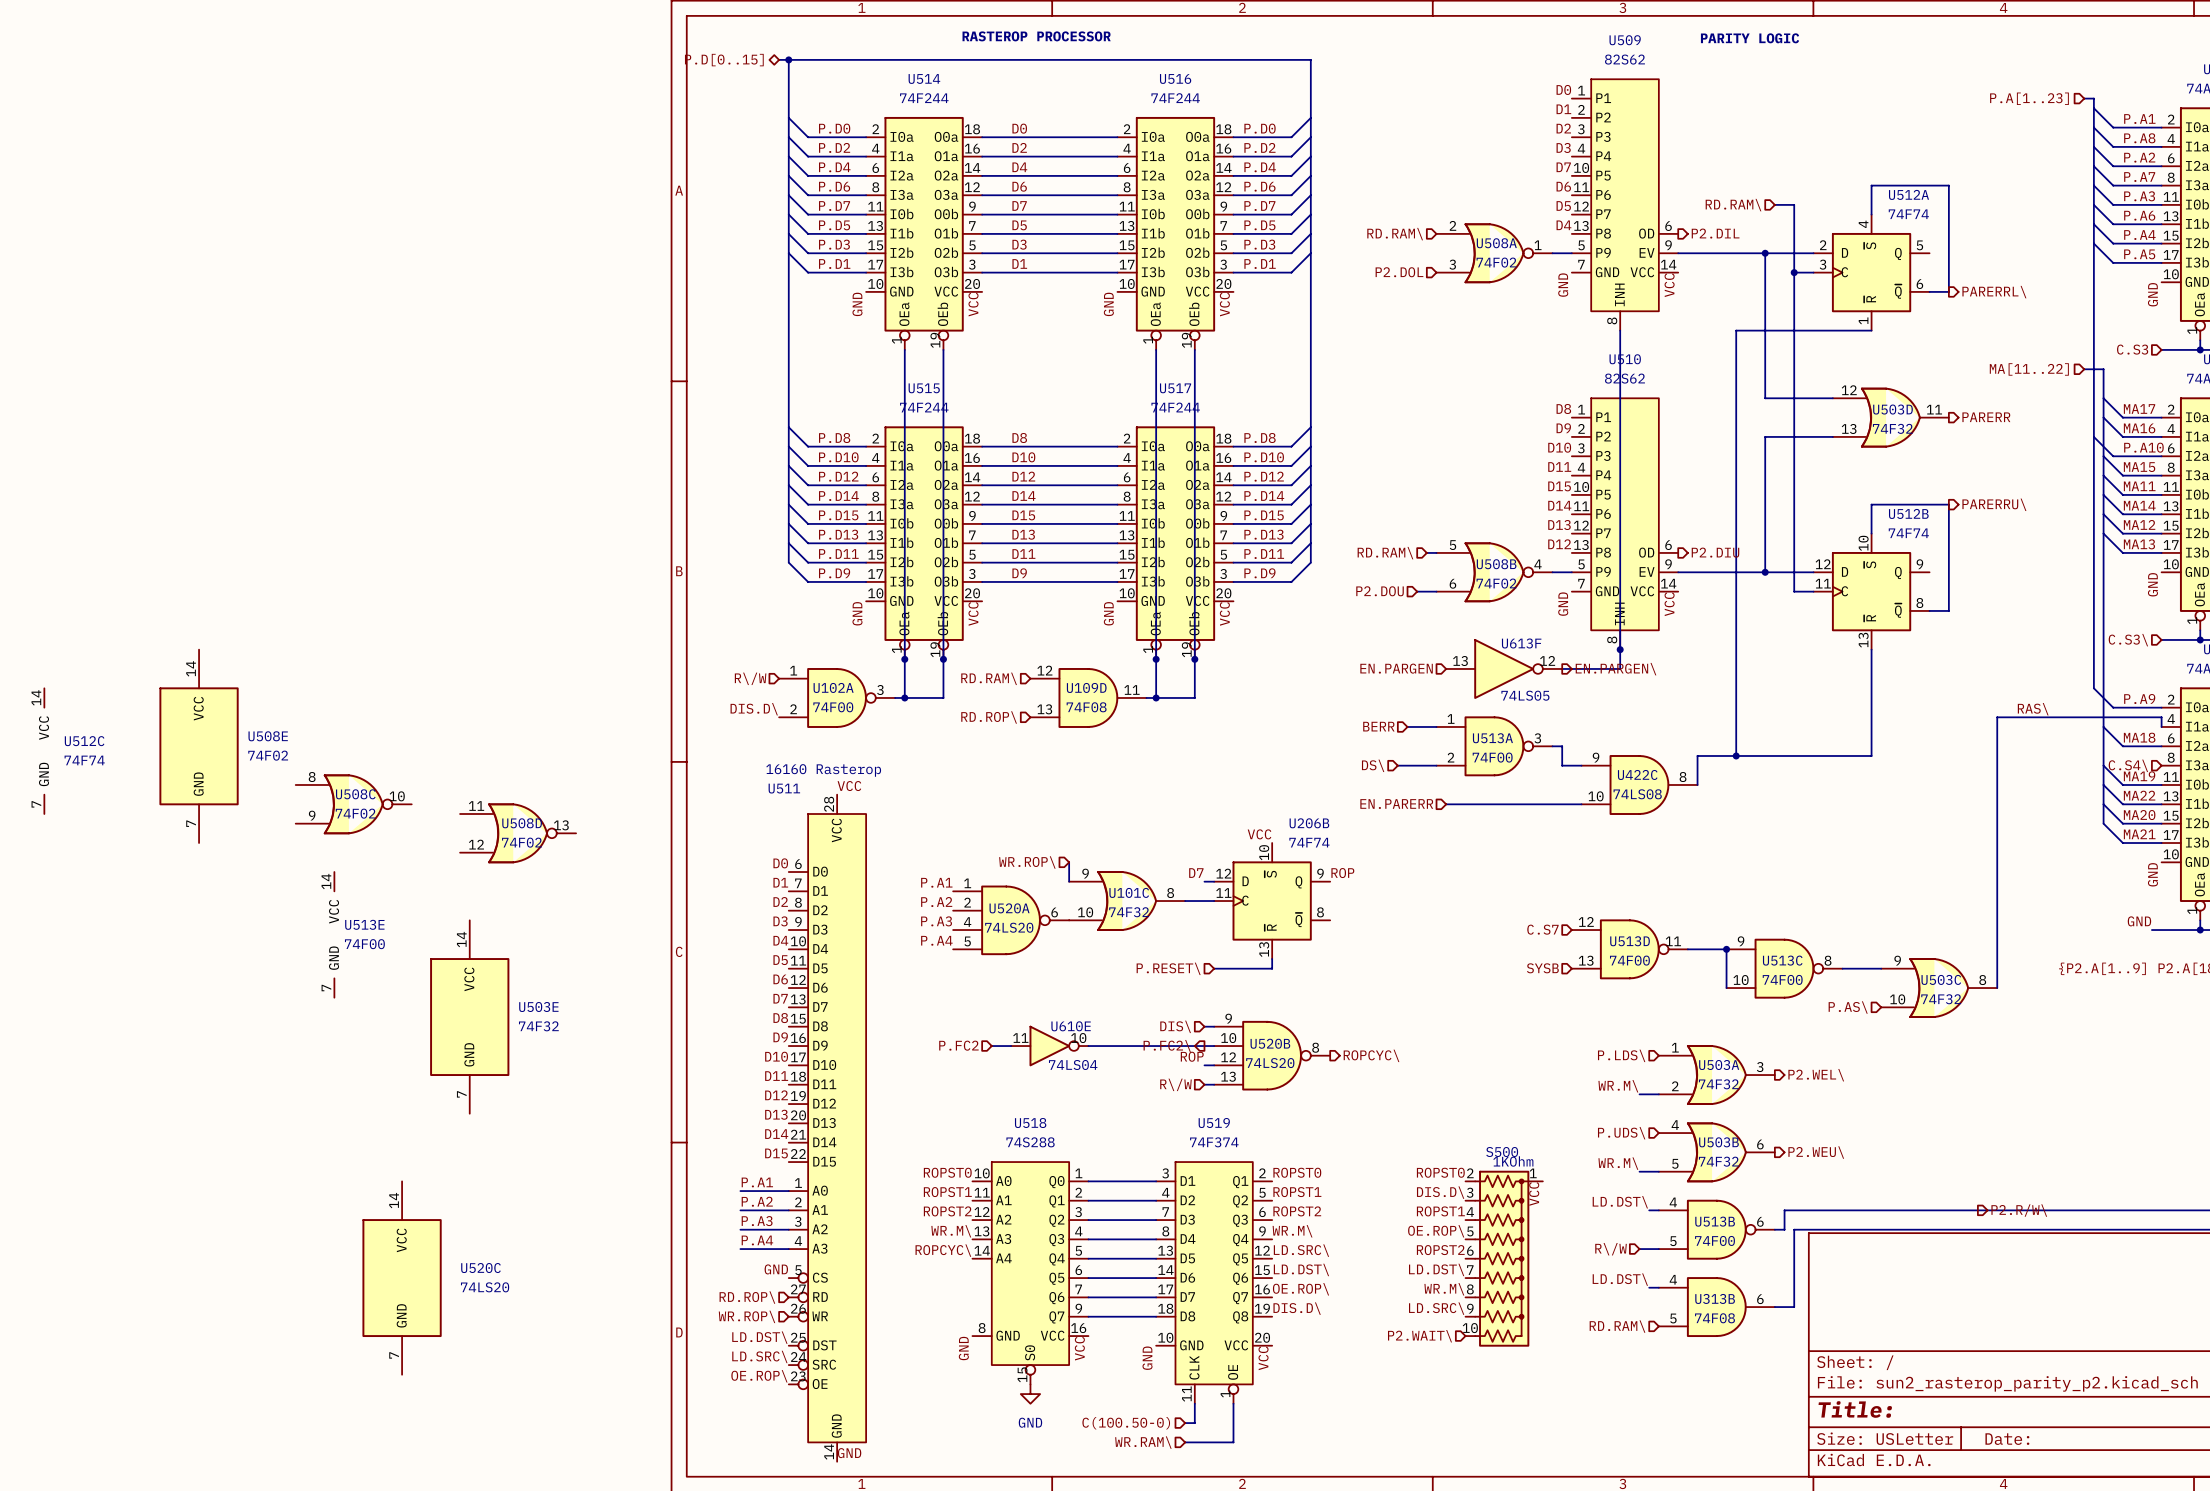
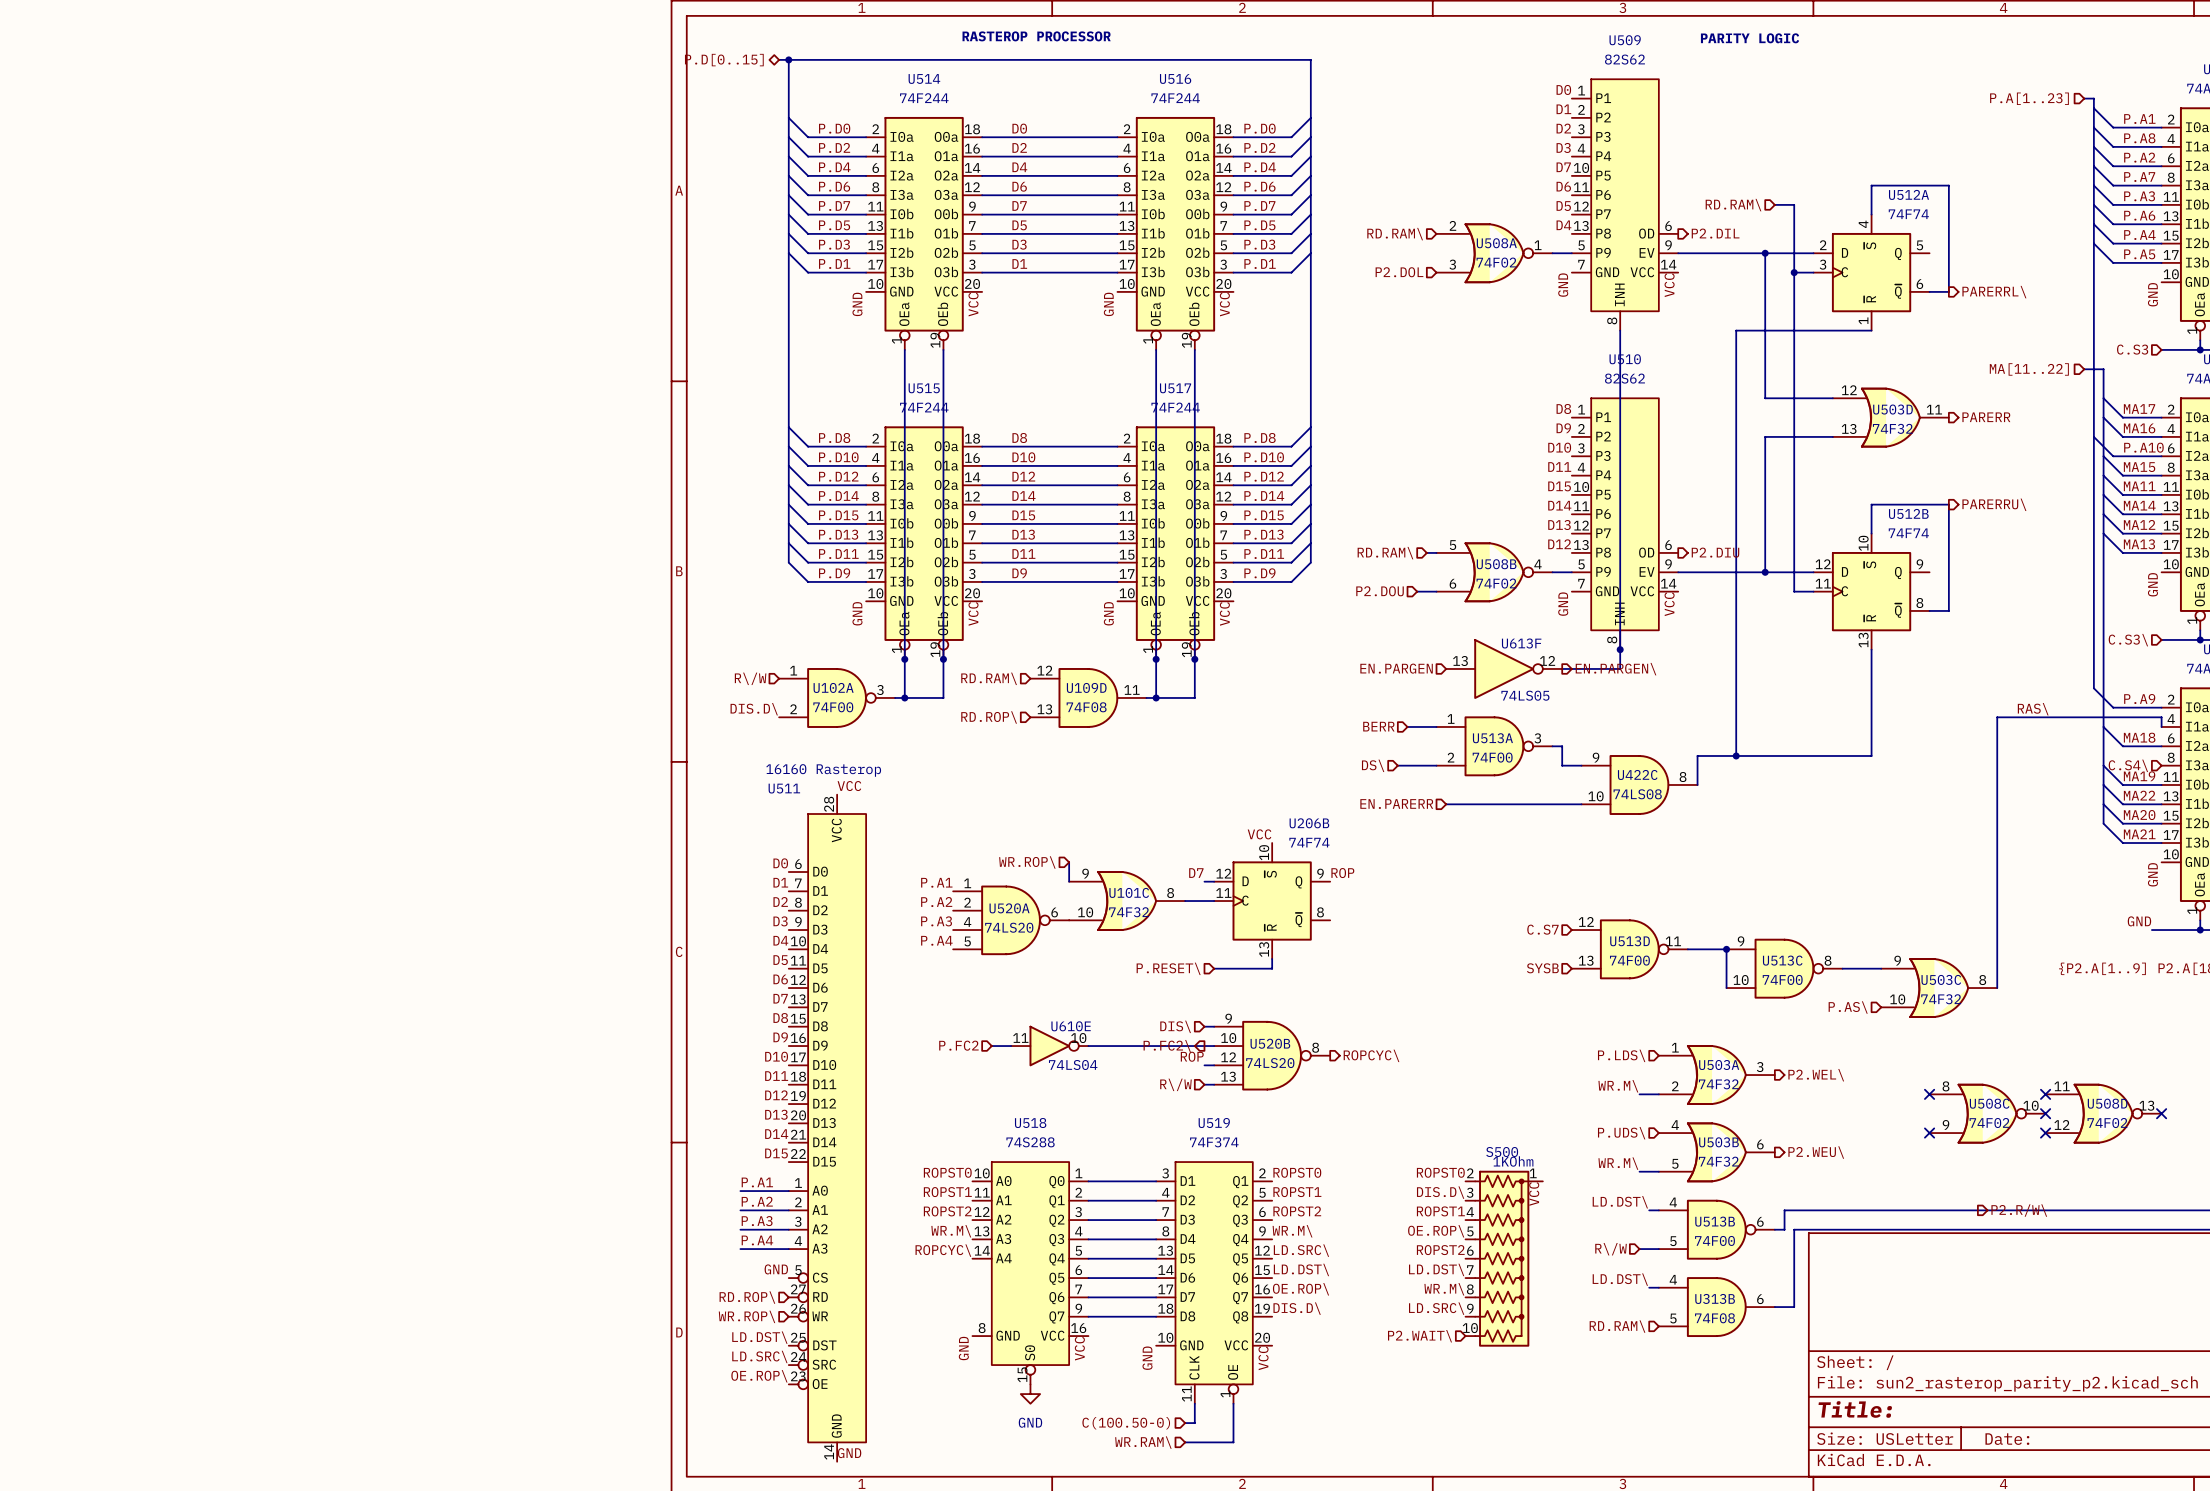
U508E: 74F02 (199, 746) -> none
U512C: 74F74 (44, 751) -> none
U508C position: (353, 804) -> (1987, 1113)
U508D position: (518, 833) -> (2103, 1113)
U513E: 74F00 (334, 934) -> none
U503E: 74F32 (469, 1017) -> none
no-connect mark: none -> (1929, 1094)
no-connect mark: none -> (2045, 1094)
no-connect mark: none -> (2045, 1113)
no-connect mark: none -> (2161, 1113)
no-connect mark: none -> (1929, 1133)
no-connect mark: none -> (2045, 1133)
U520C: 74LS20 (402, 1278) -> none

